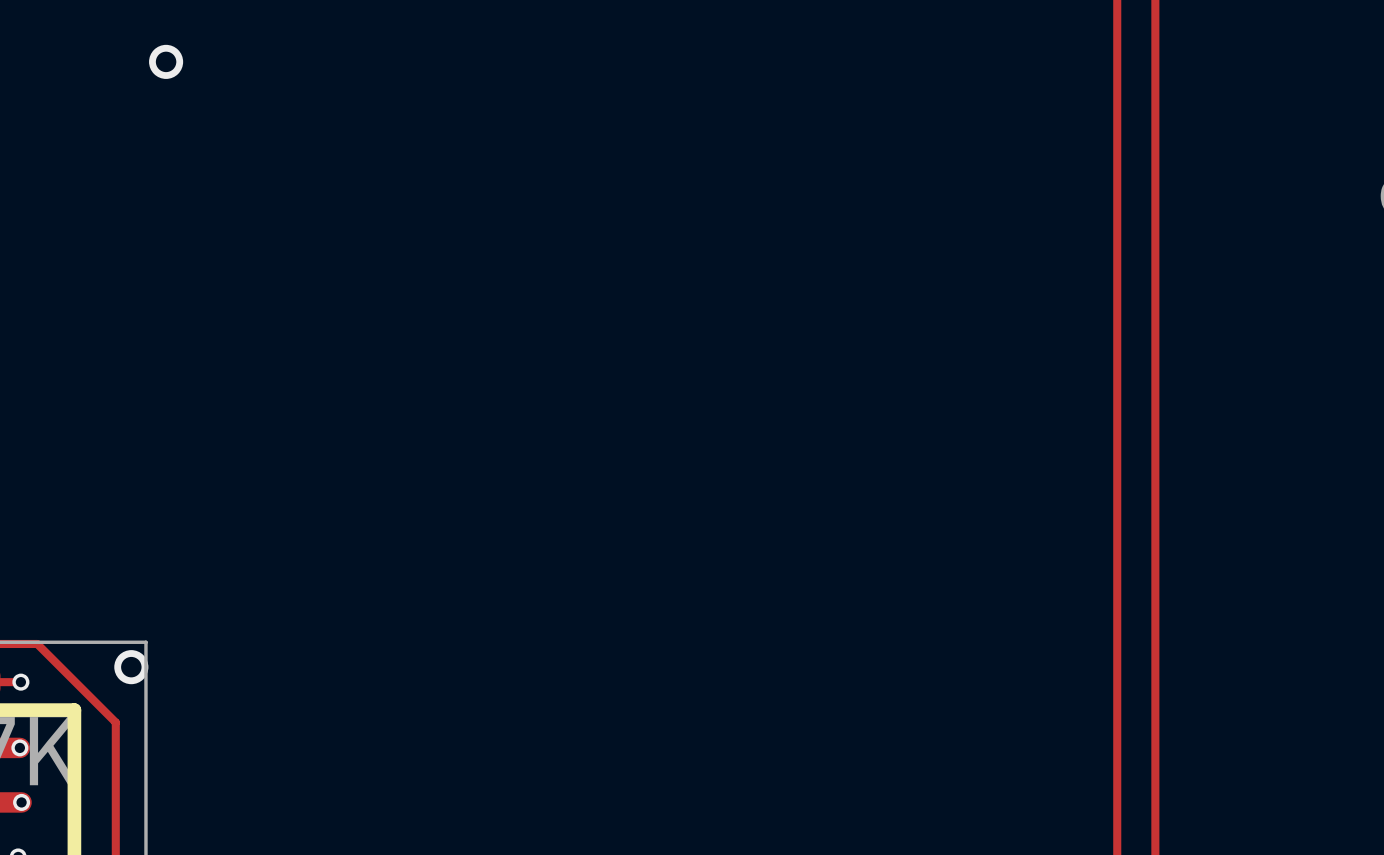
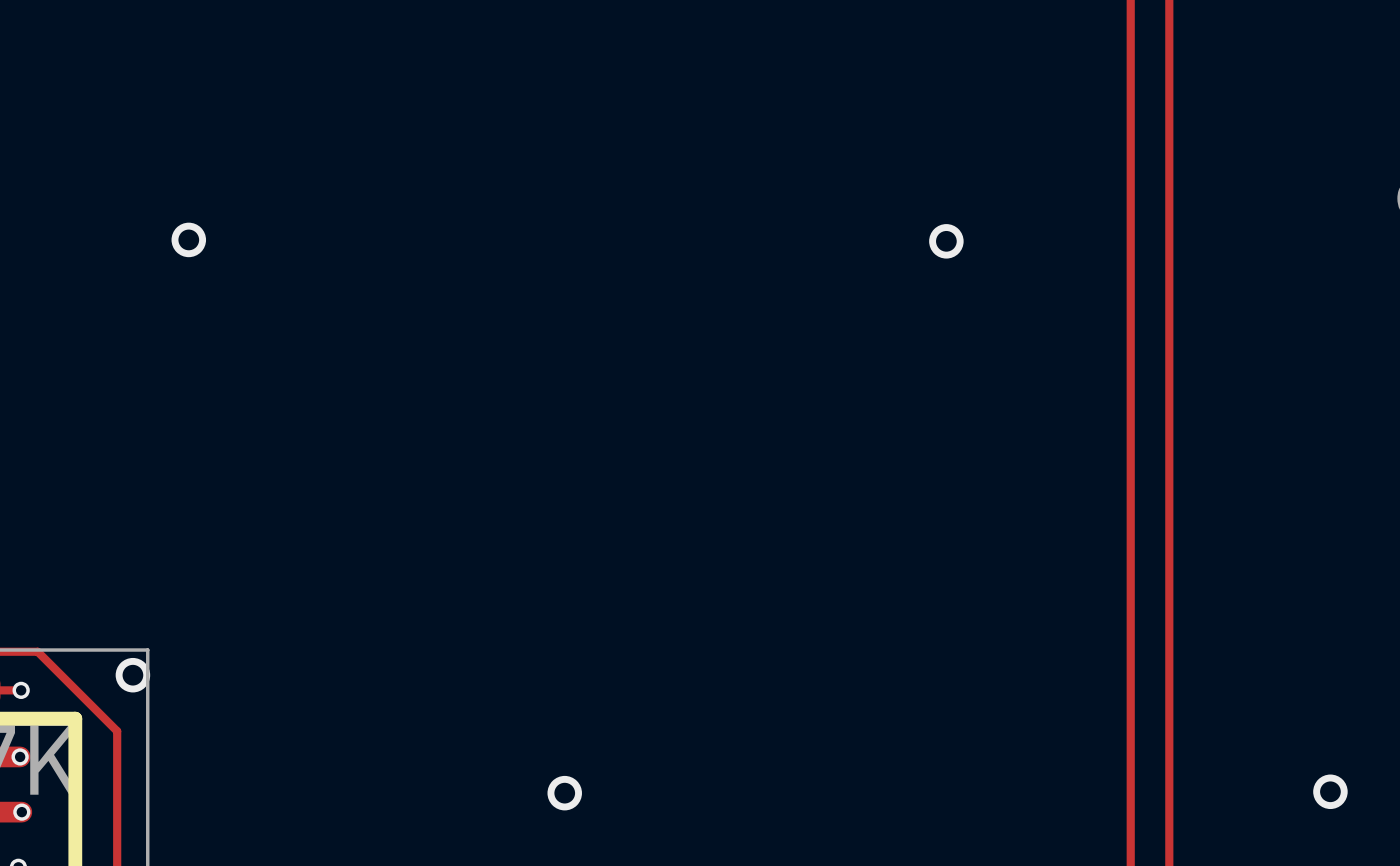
via position: (166, 61) -> (188, 239)
via: none -> (946, 241)
via: none -> (1330, 791)
via: none -> (564, 793)

